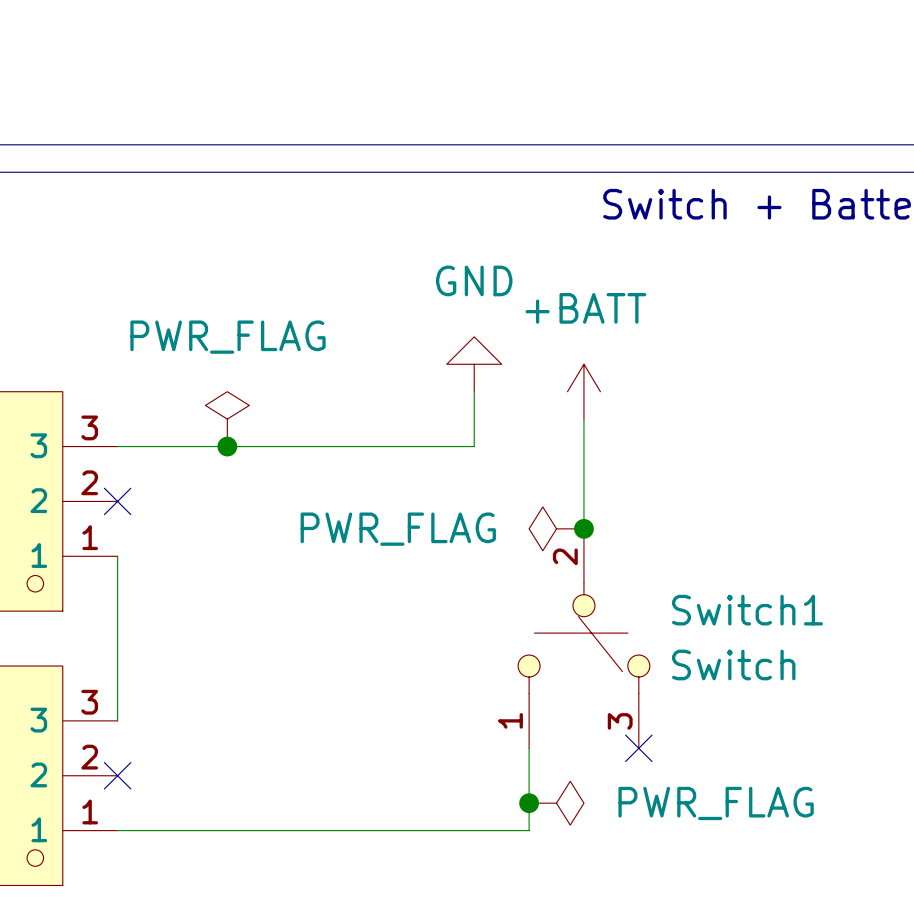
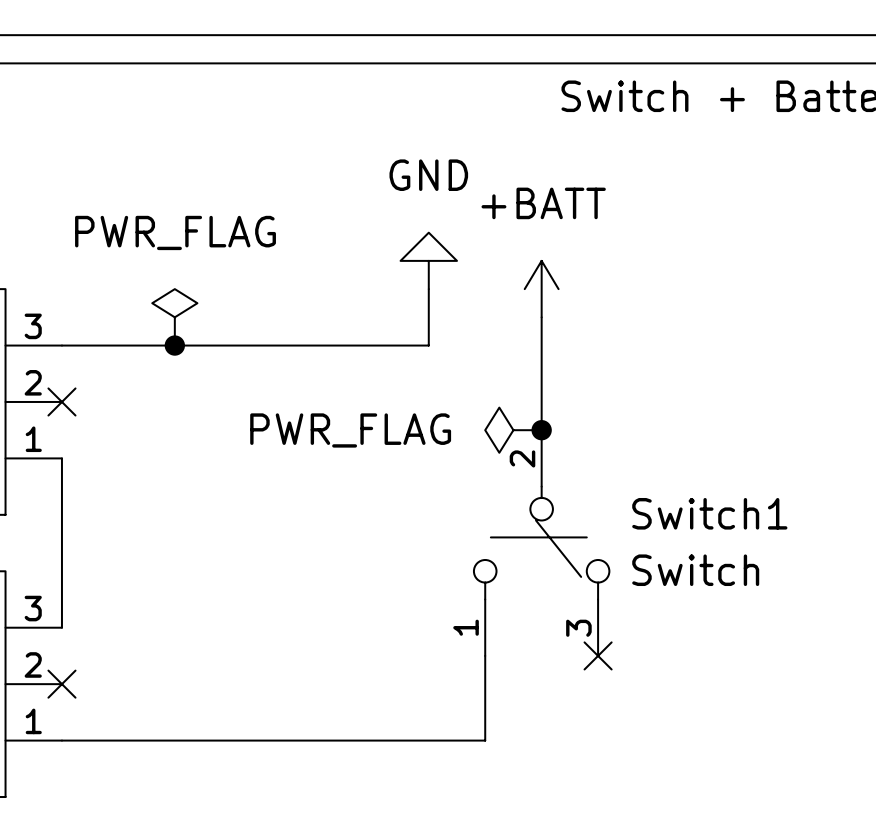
junction: (529, 803) -> none
power symbol: PWR_FLAG (556, 803) -> none

